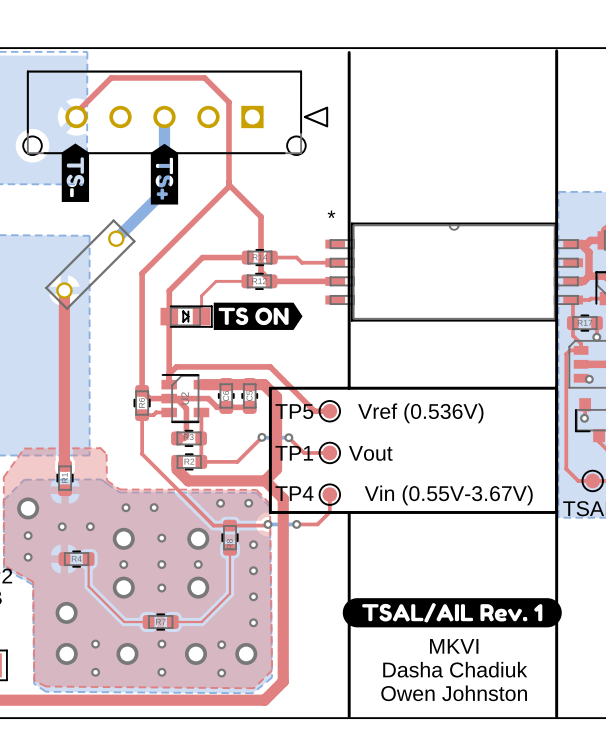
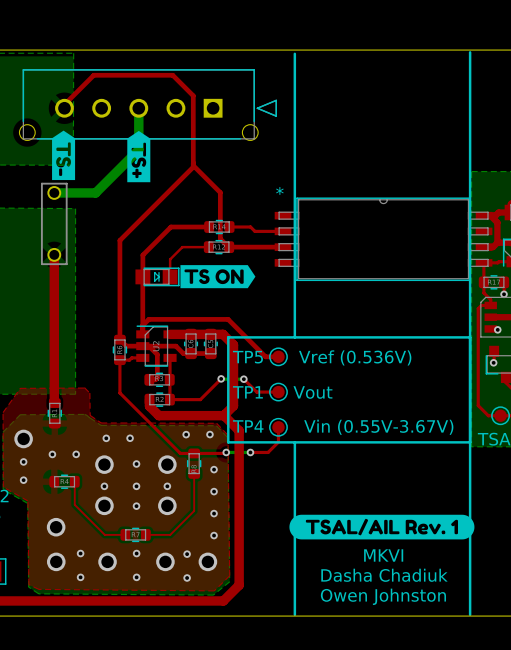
bottom track: (164, 166) (164, 190) (116, 238) -> (138, 149) (95, 192) (54, 192)
part: none -> (54, 223)
part: (90, 264) -> none

